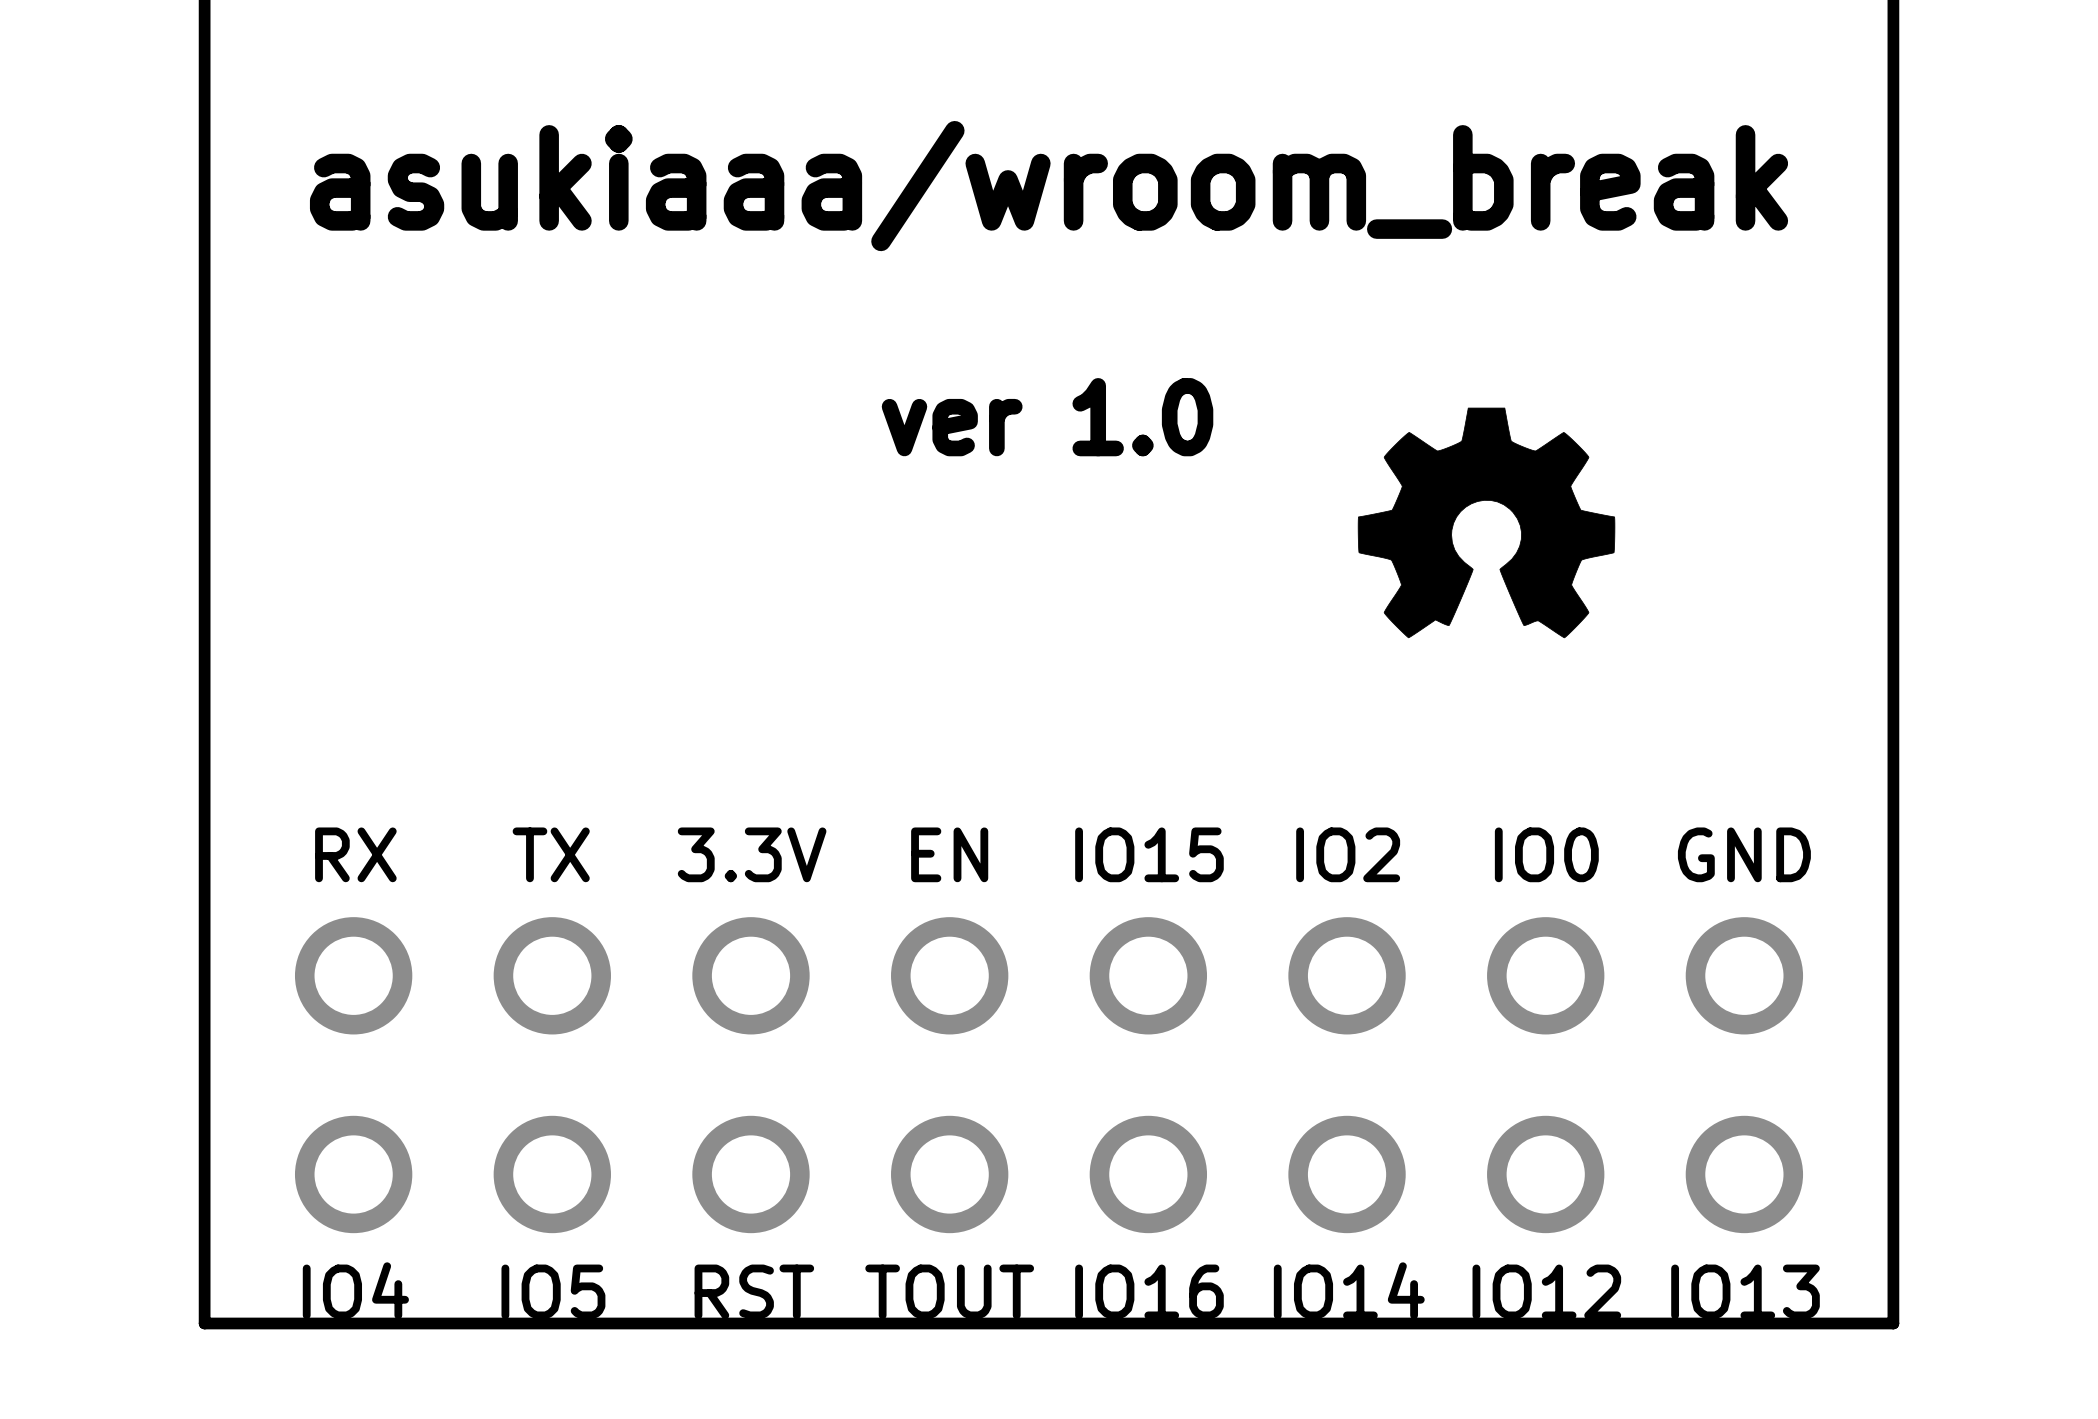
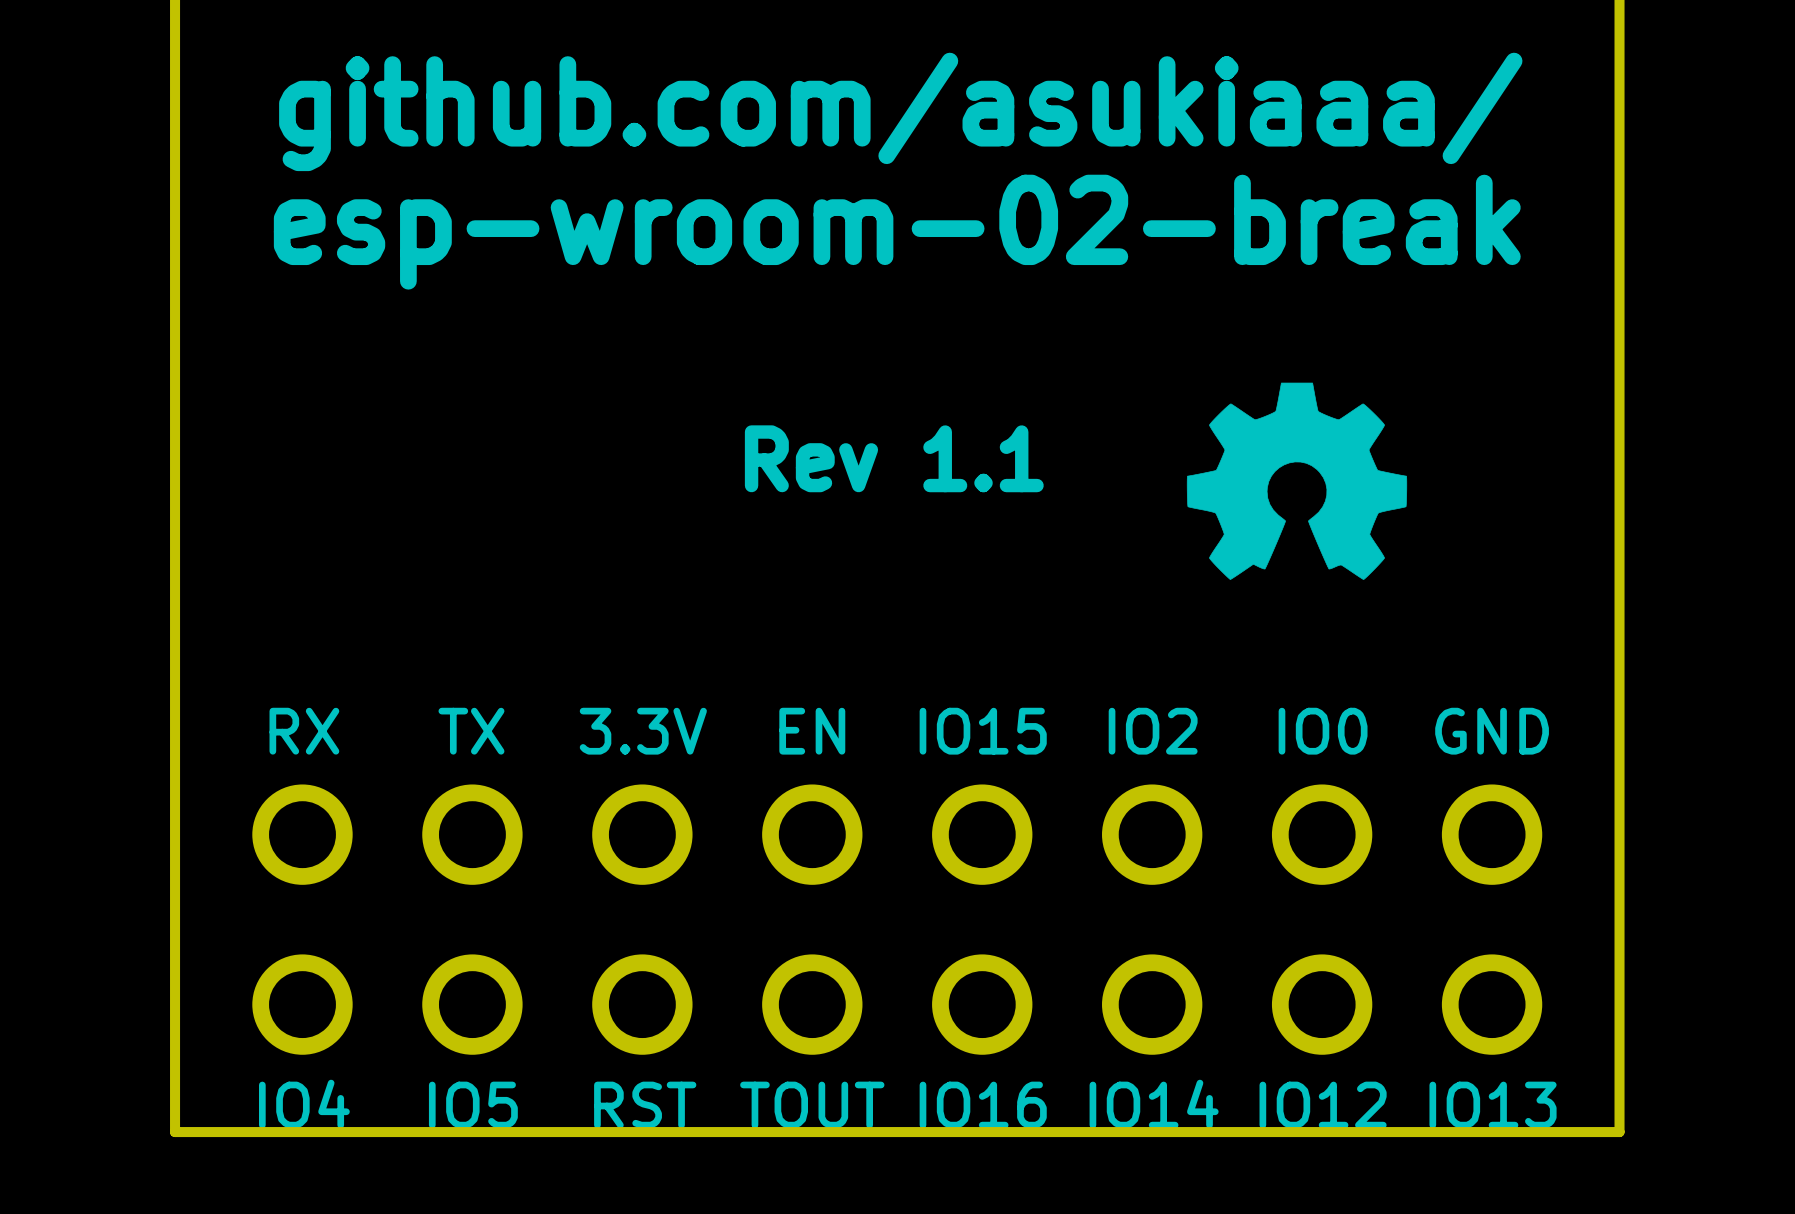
text: none -> github.com/asukiaaa/ (900, 111)
text: asukiaaa/wroom_break (1049, 186) -> none
text: none -> esp-wroom-02-break (897, 232)
text: ver 1.0 (1047, 417) -> none
drawing position: (1486, 522) -> (1297, 481)
text: none -> Rev 1.1 (894, 458)

